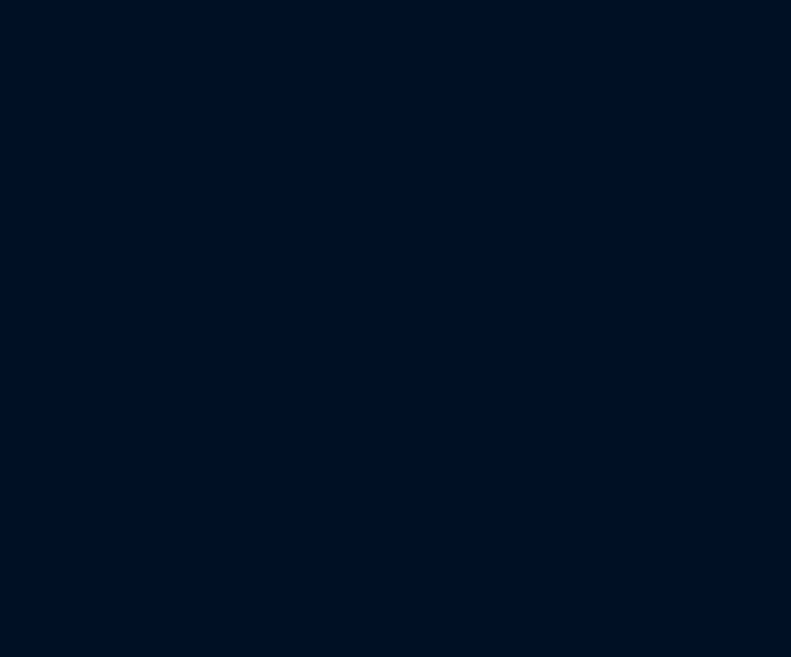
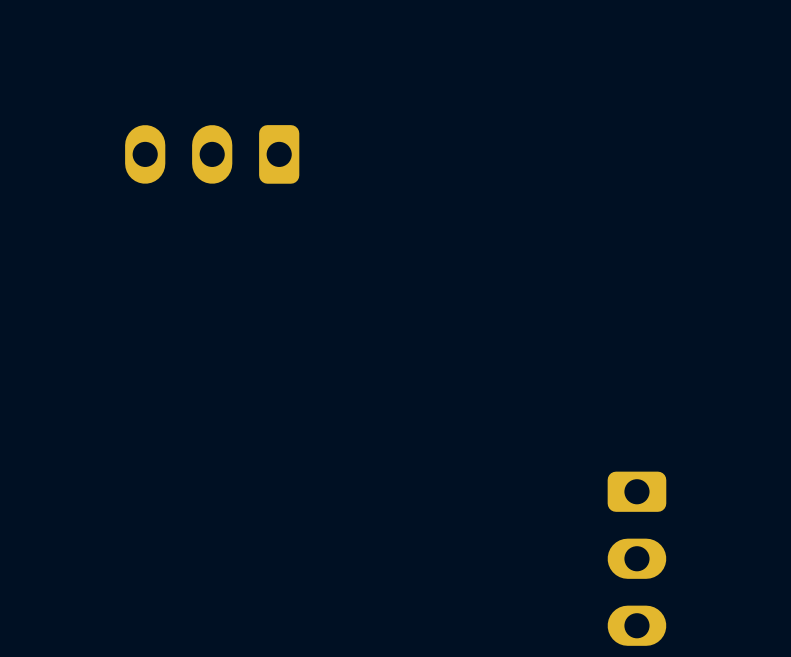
part: none -> (212, 154)
part: none -> (636, 558)

